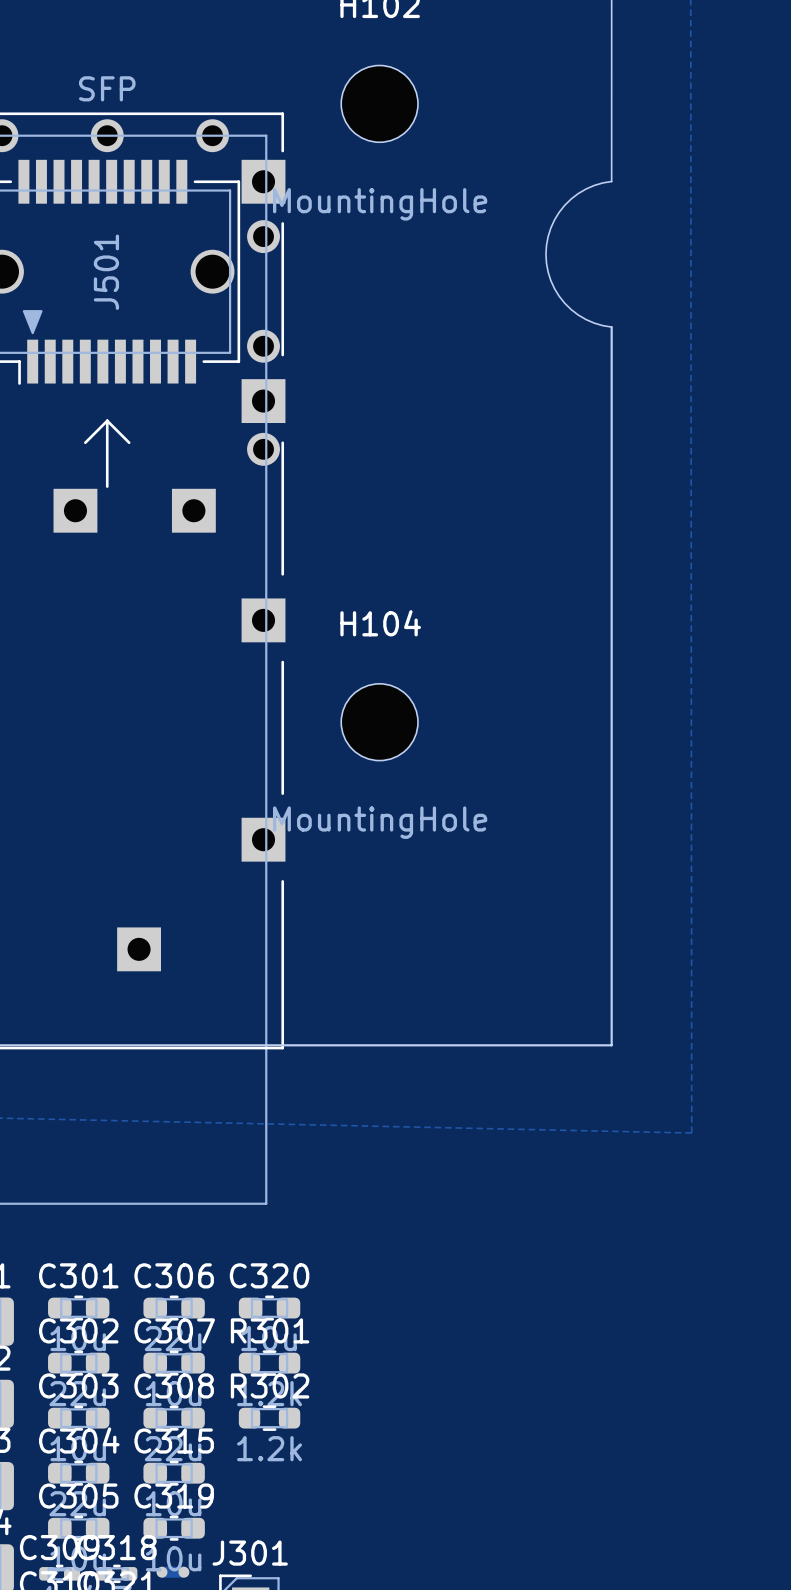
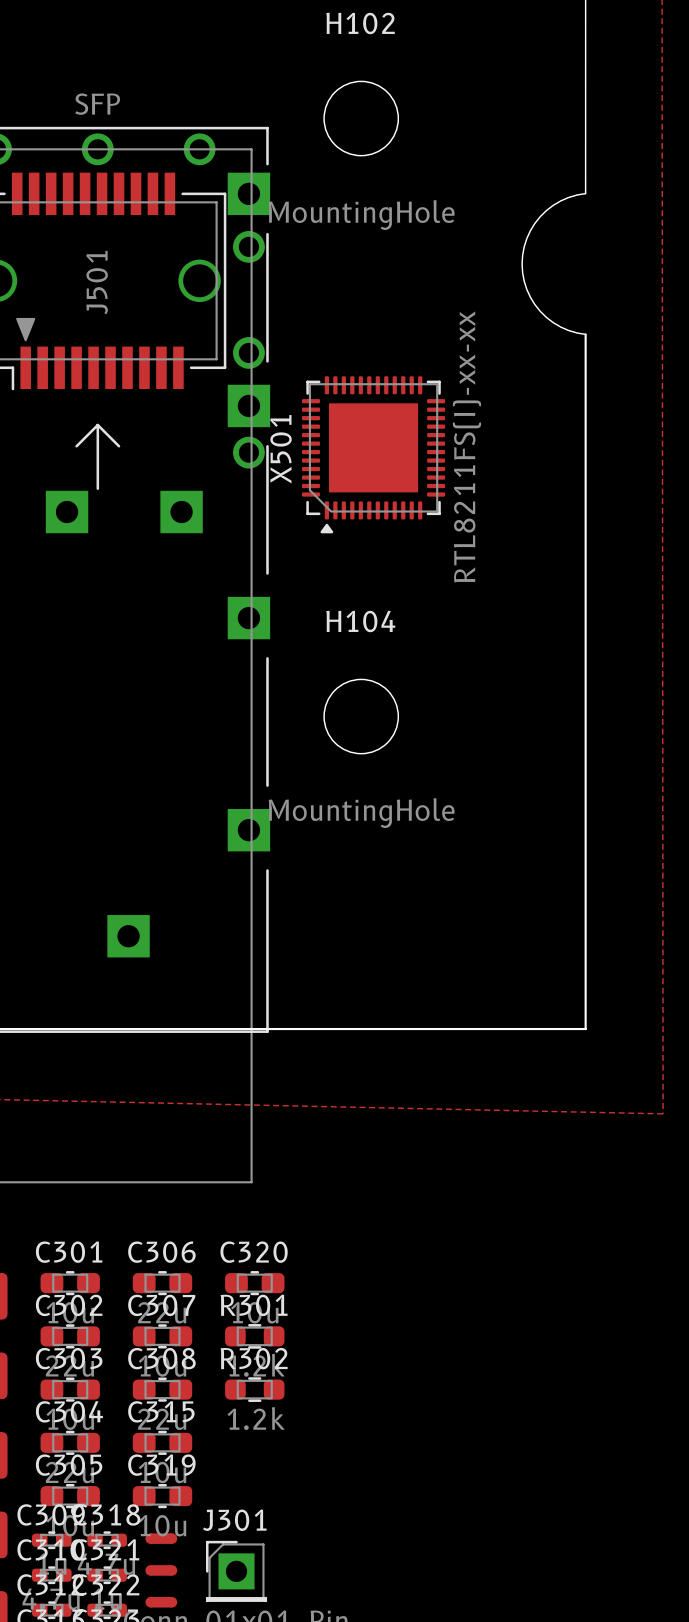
X501: none -> RTL8211FS(I)-xx-xx (373, 454)

